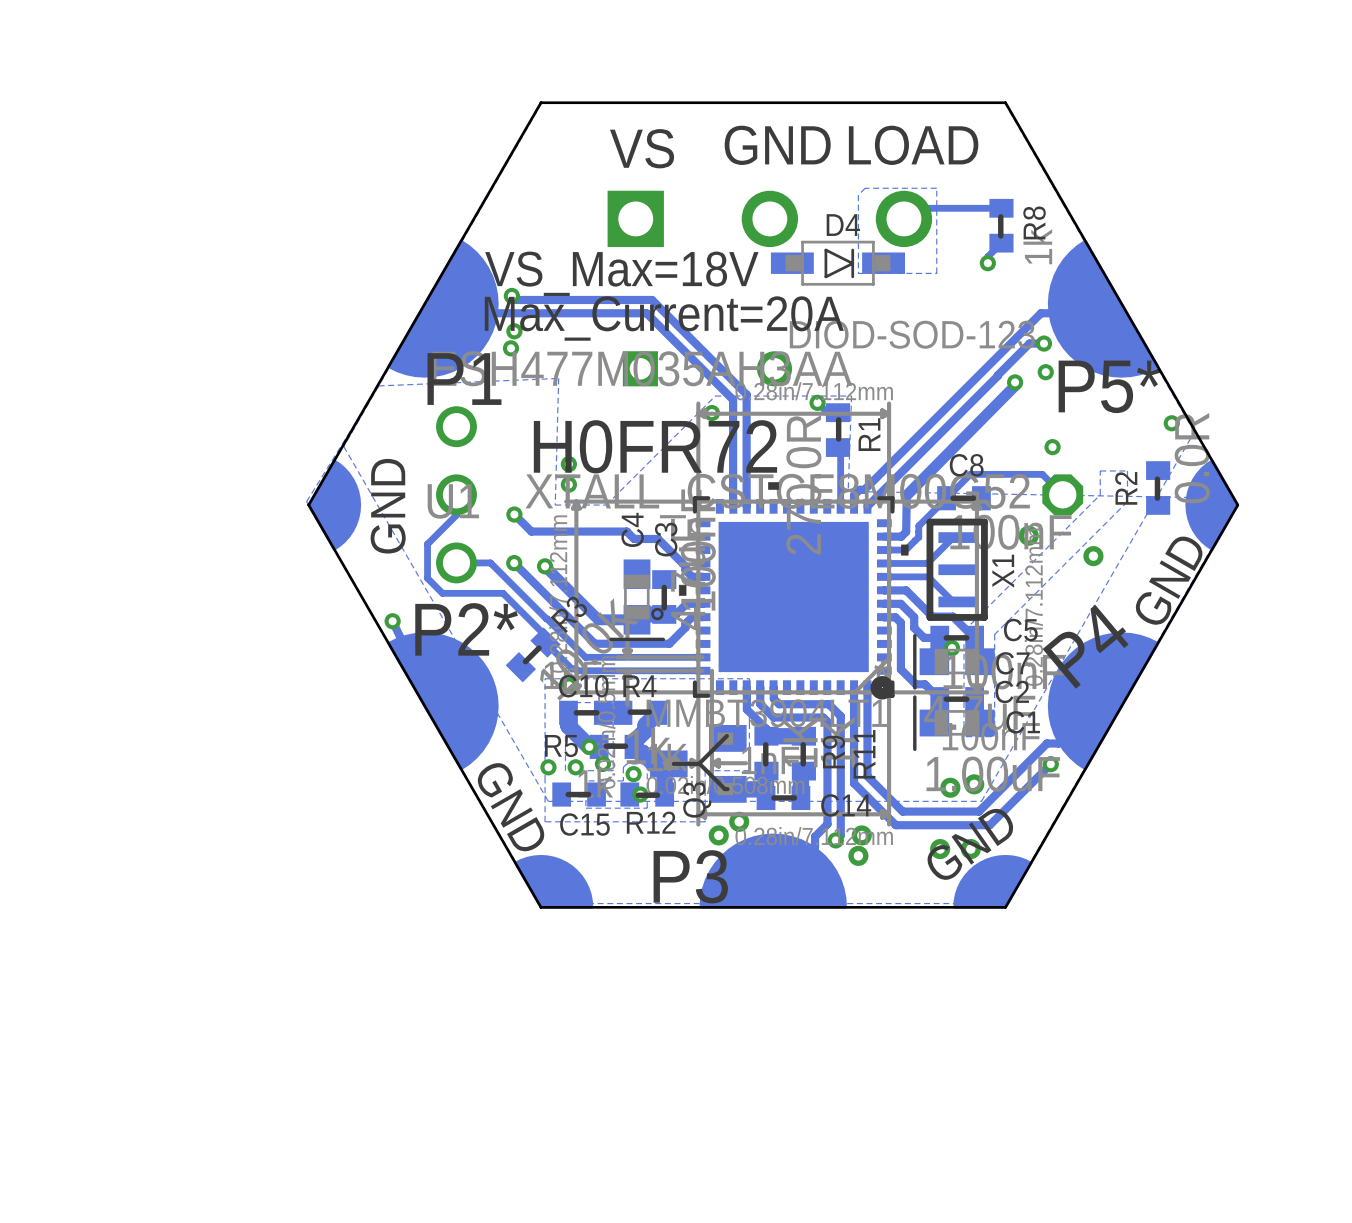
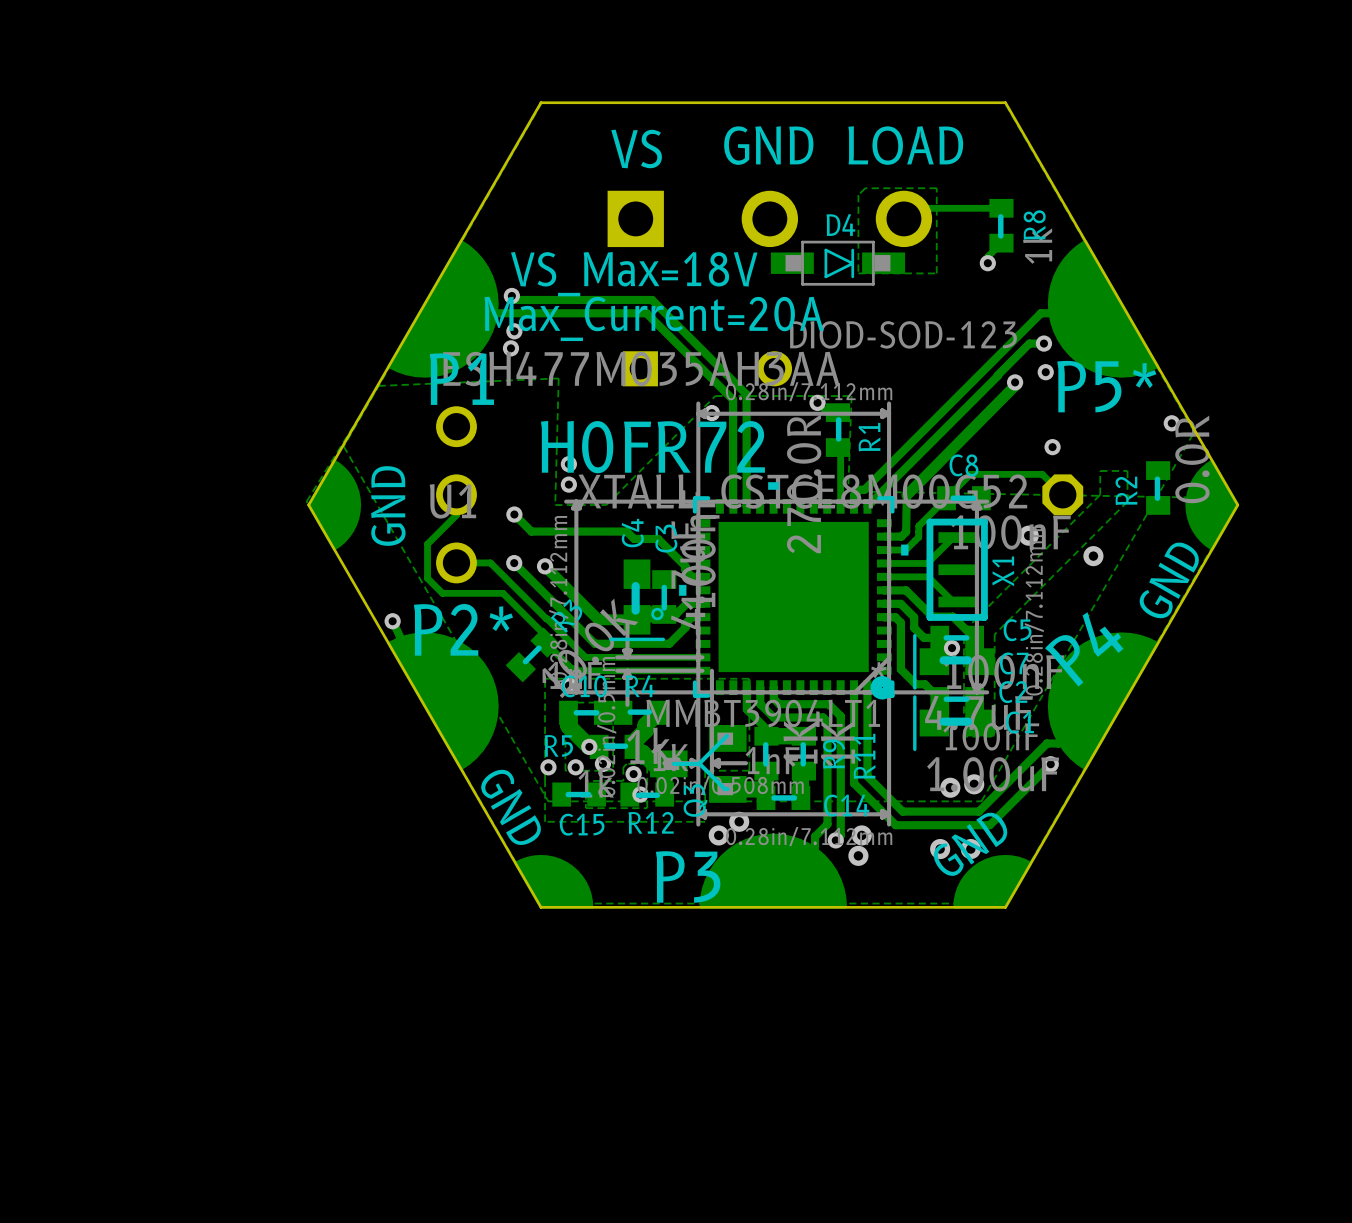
C4 footprint: [609, 559, 665, 642] -> [609, 559, 665, 642]
C7 footprint: [913, 634, 995, 690] -> [913, 634, 995, 690]
C2 footprint: [913, 695, 995, 752] -> [913, 695, 995, 752]

